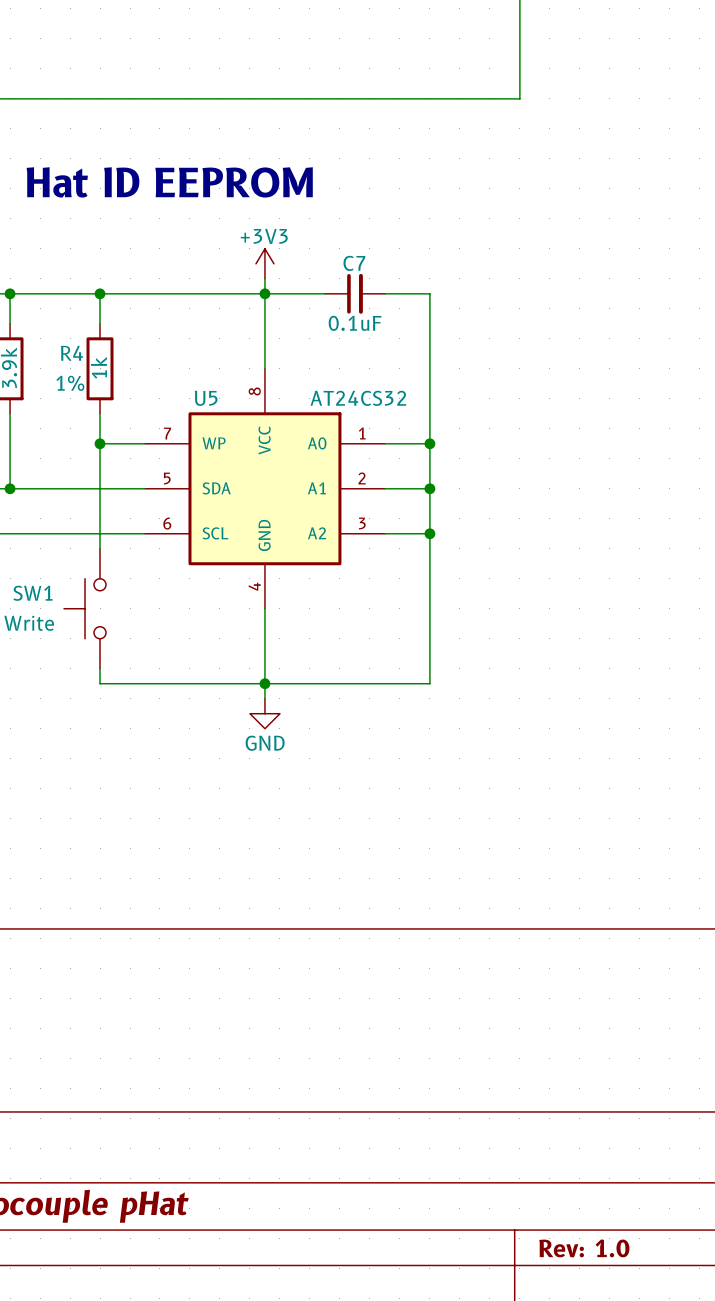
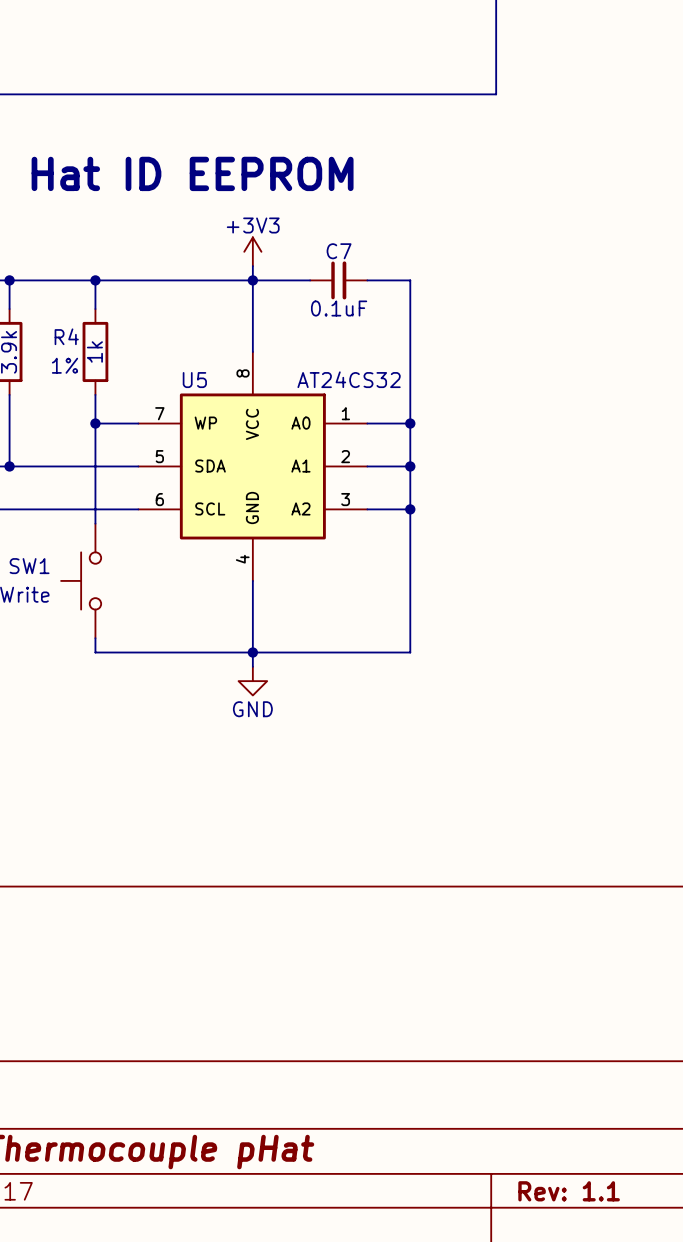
title block: Rev: 1.0 (584, 1248) -> Rev: 1.1 (569, 1191)

